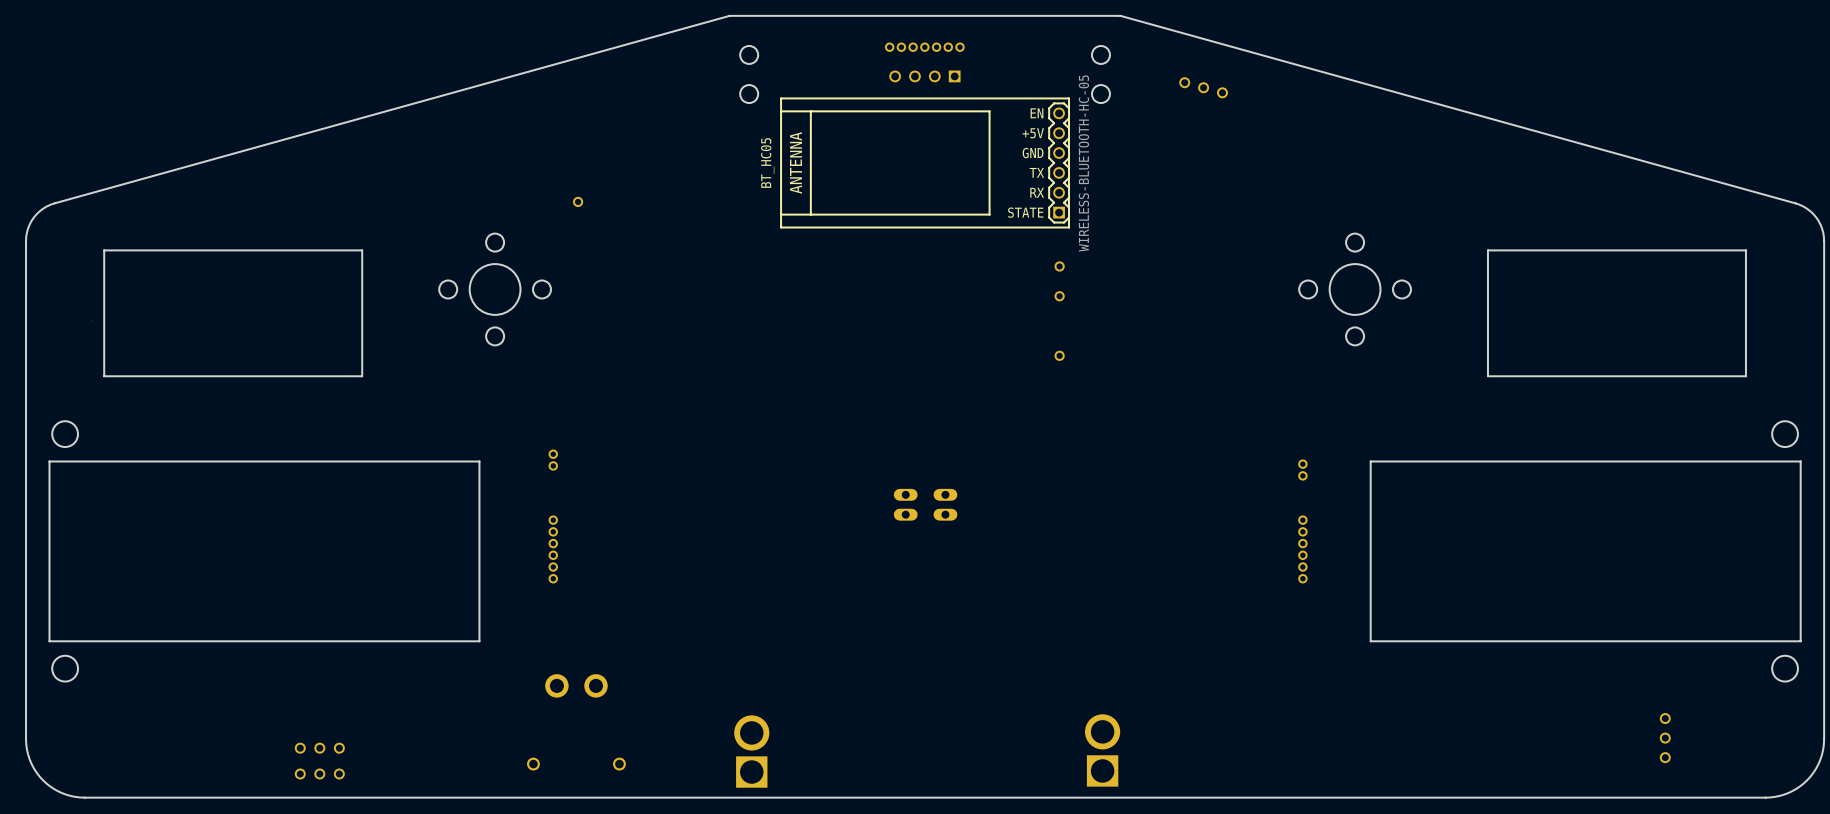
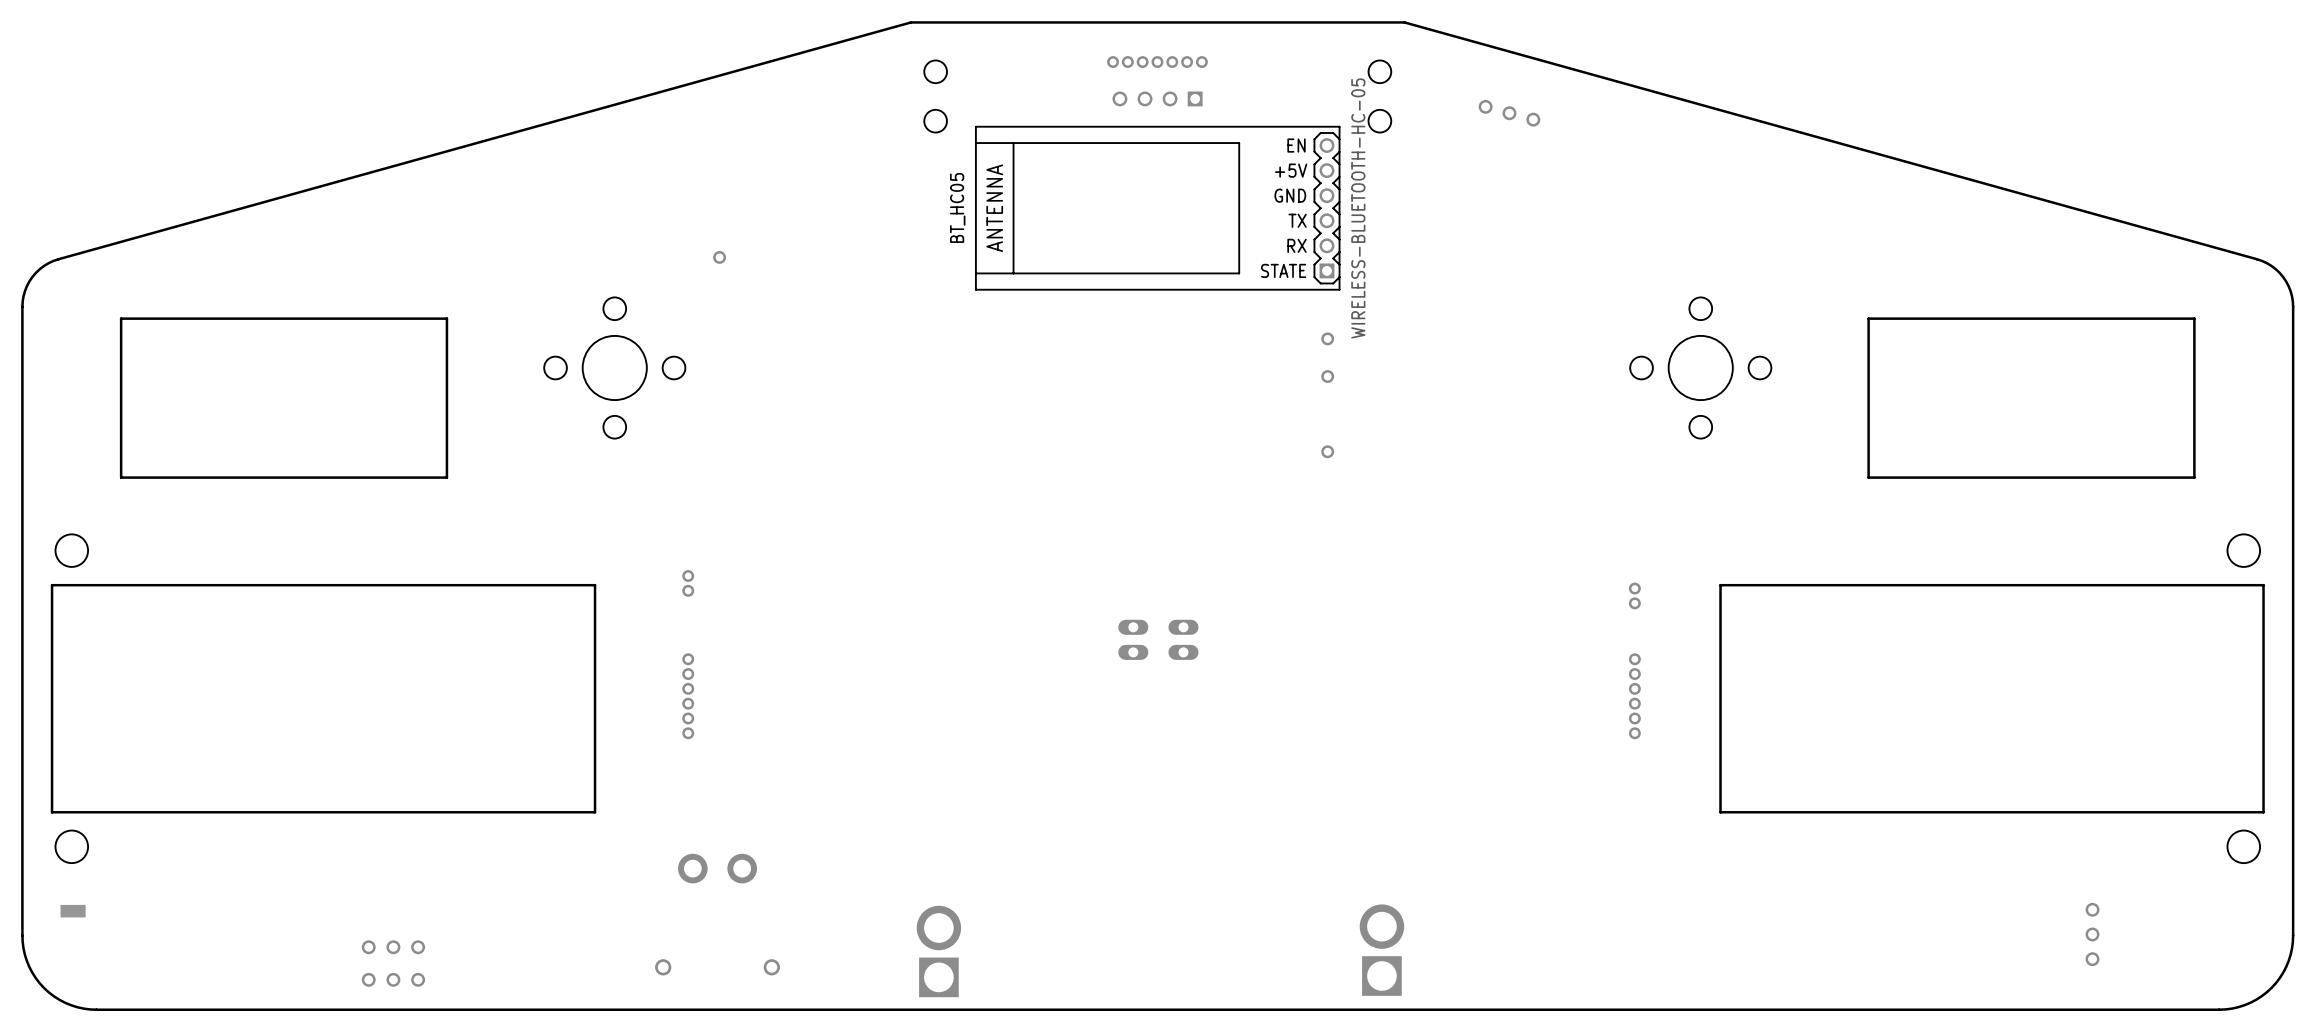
part: none -> (73, 911)

